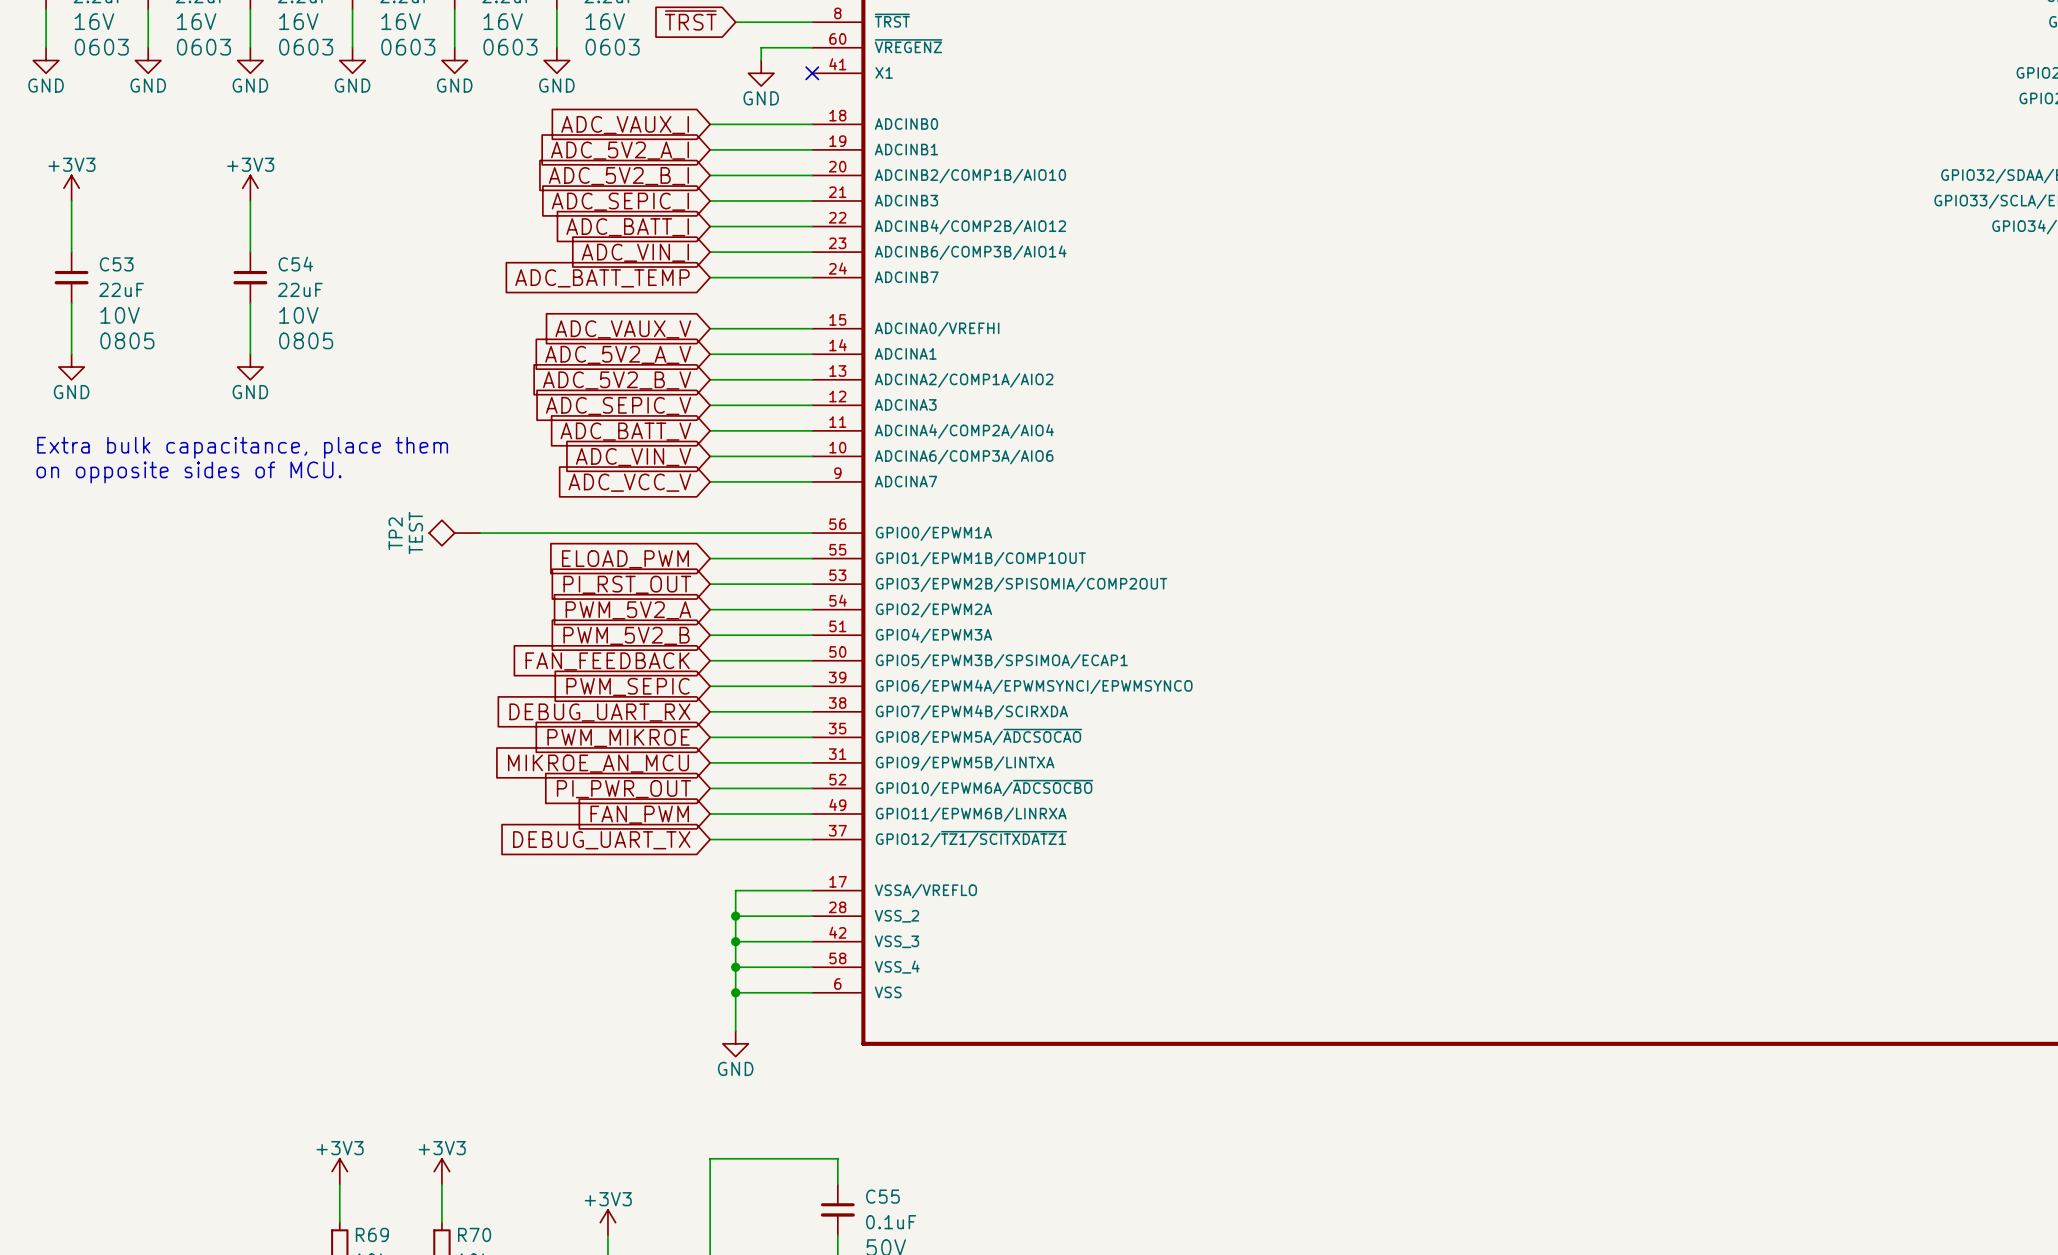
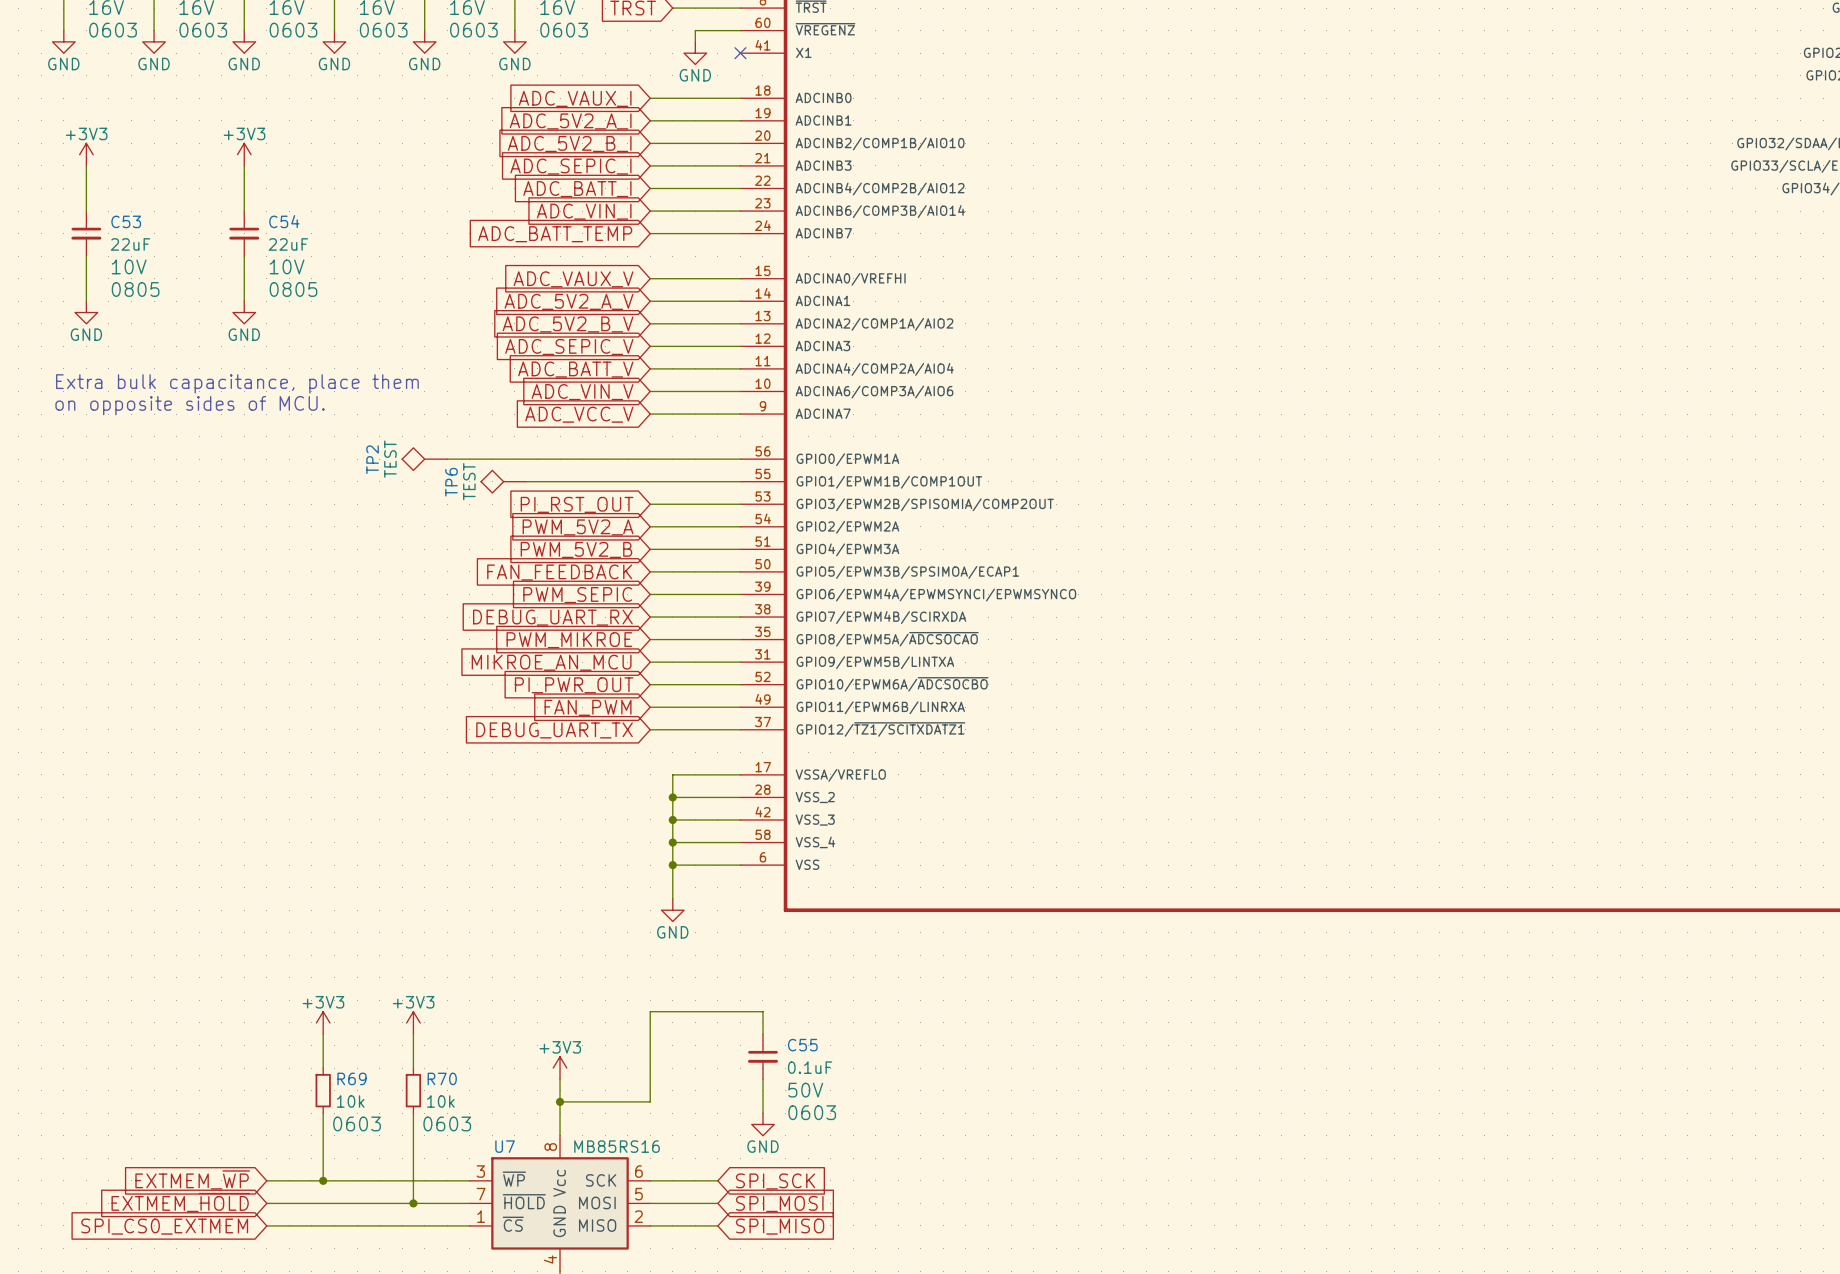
TP6: none -> TEST (503, 481)
wire: none -> (526, 481) (650, 481)
global label: ELOAD_PWM (625, 559) -> none

